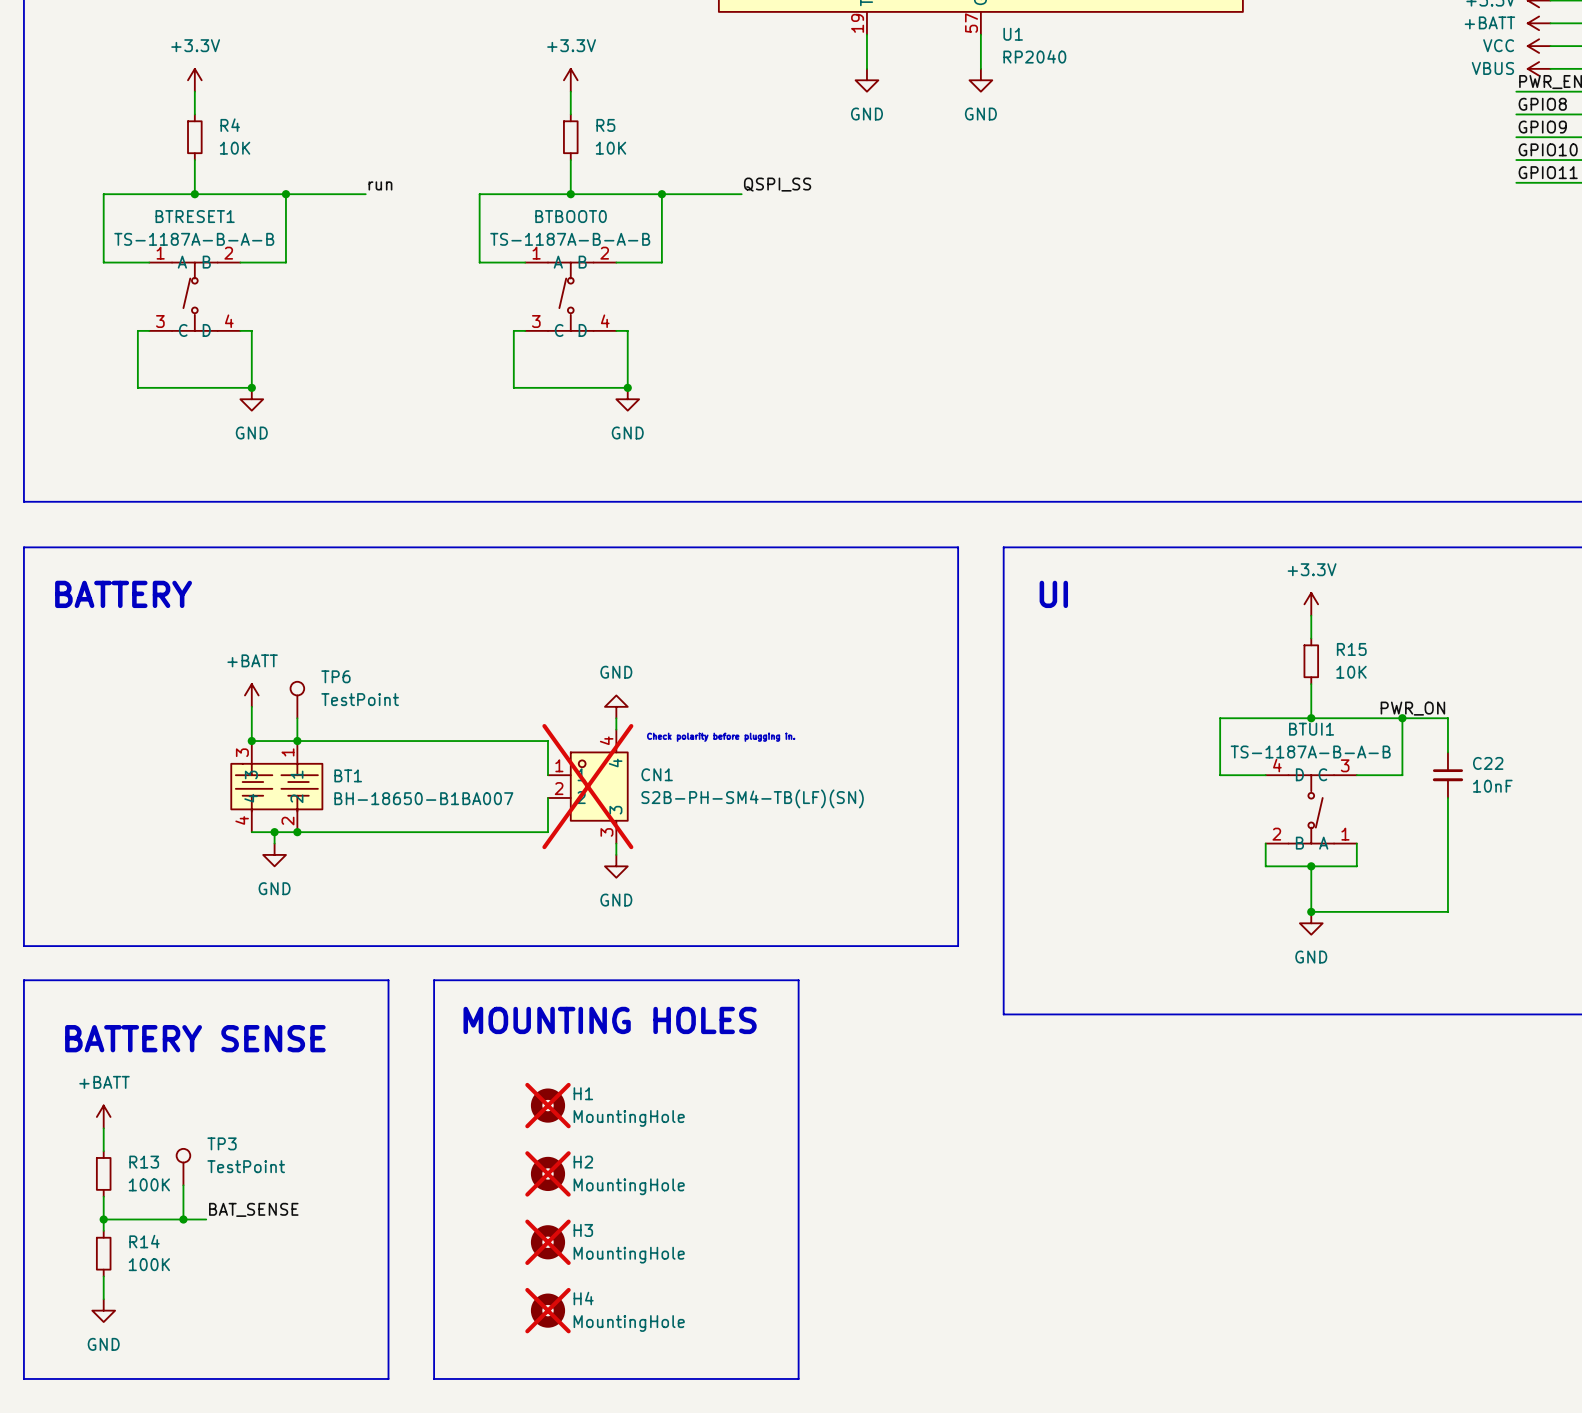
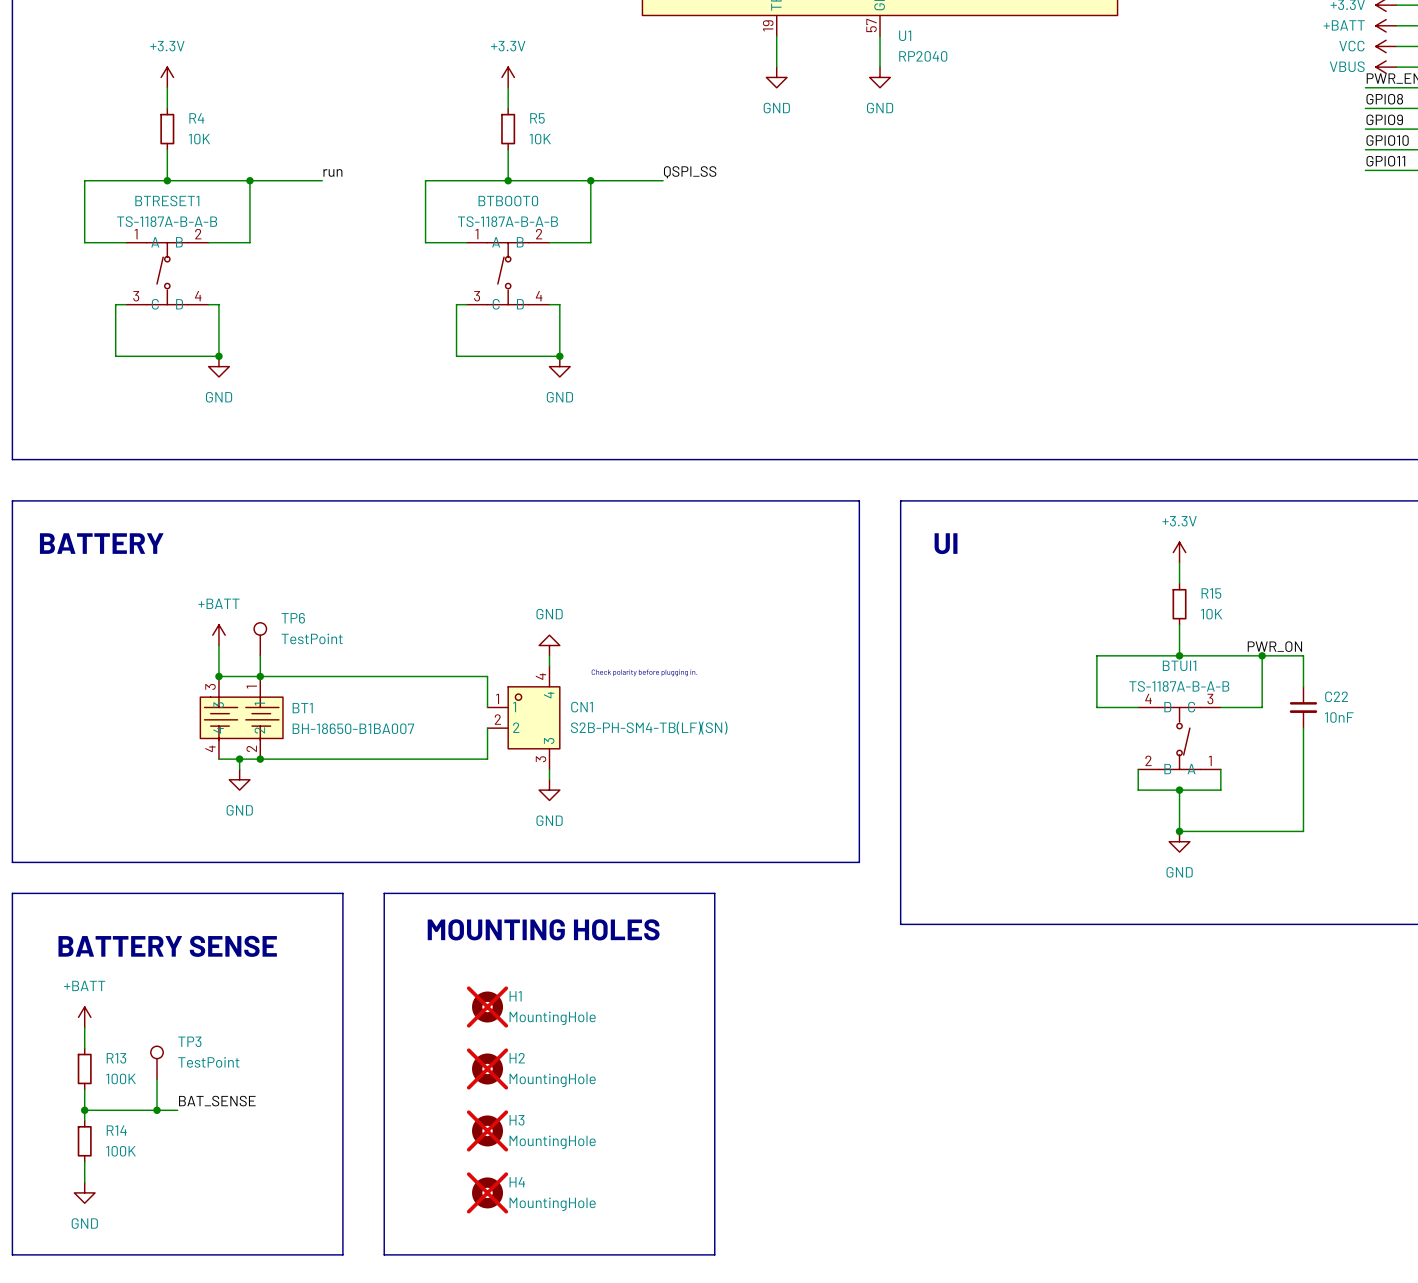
CN1 do-not-place cross: (587, 786) -> none

